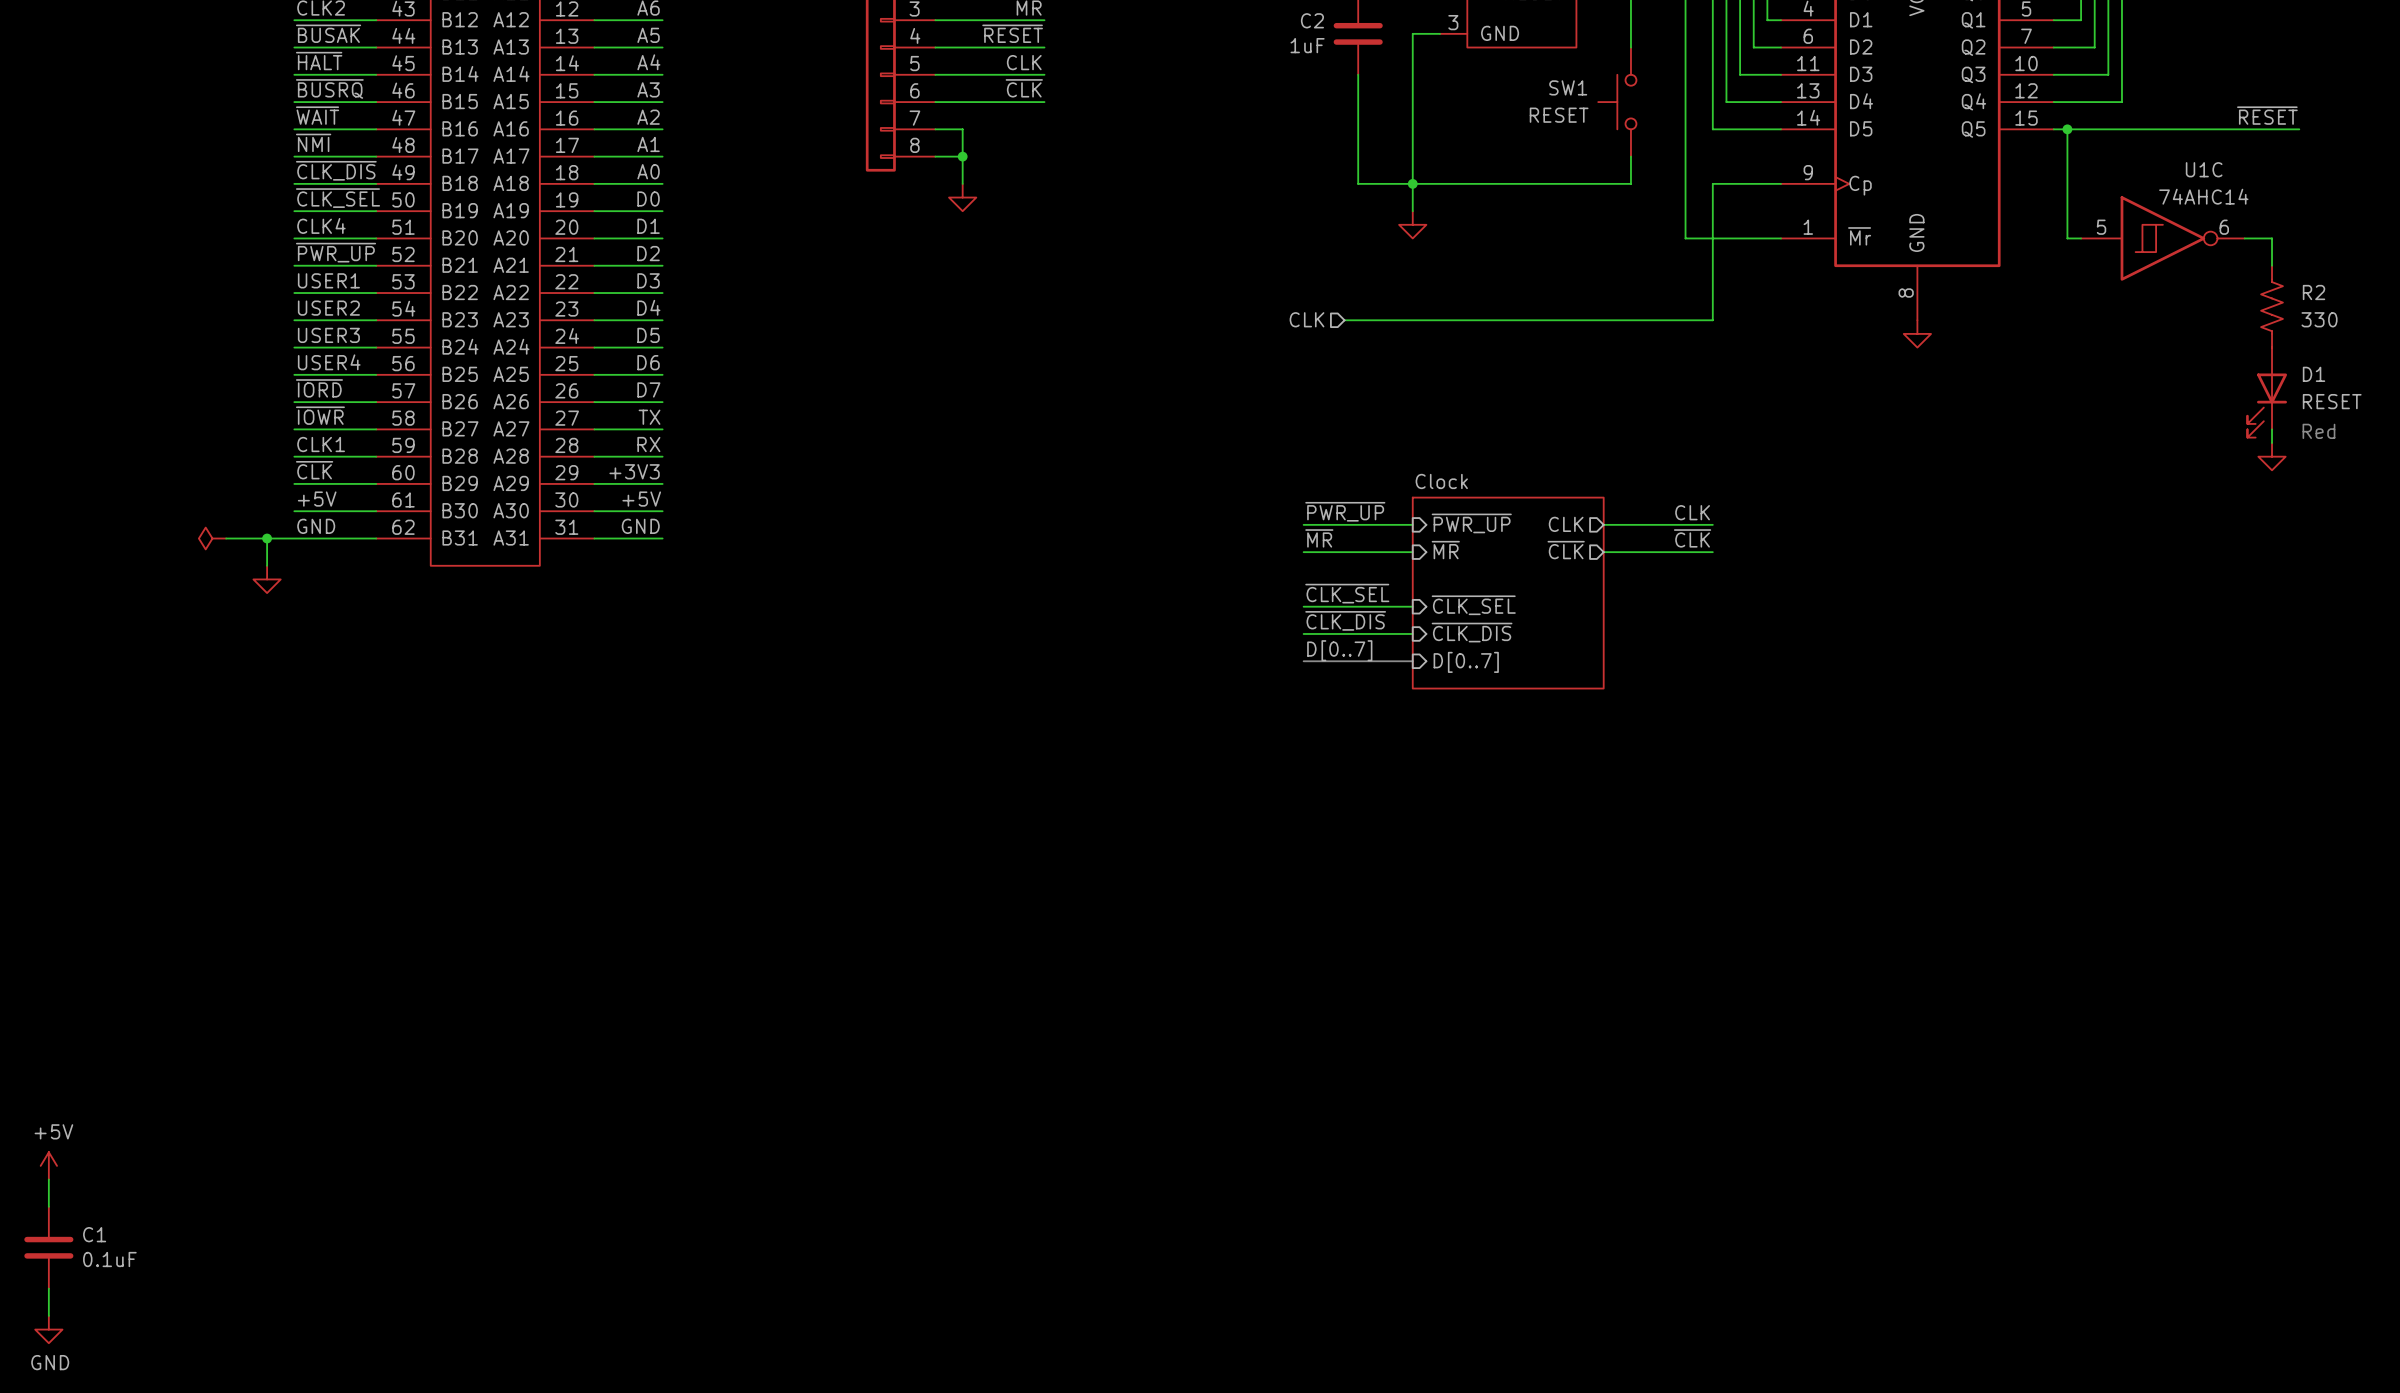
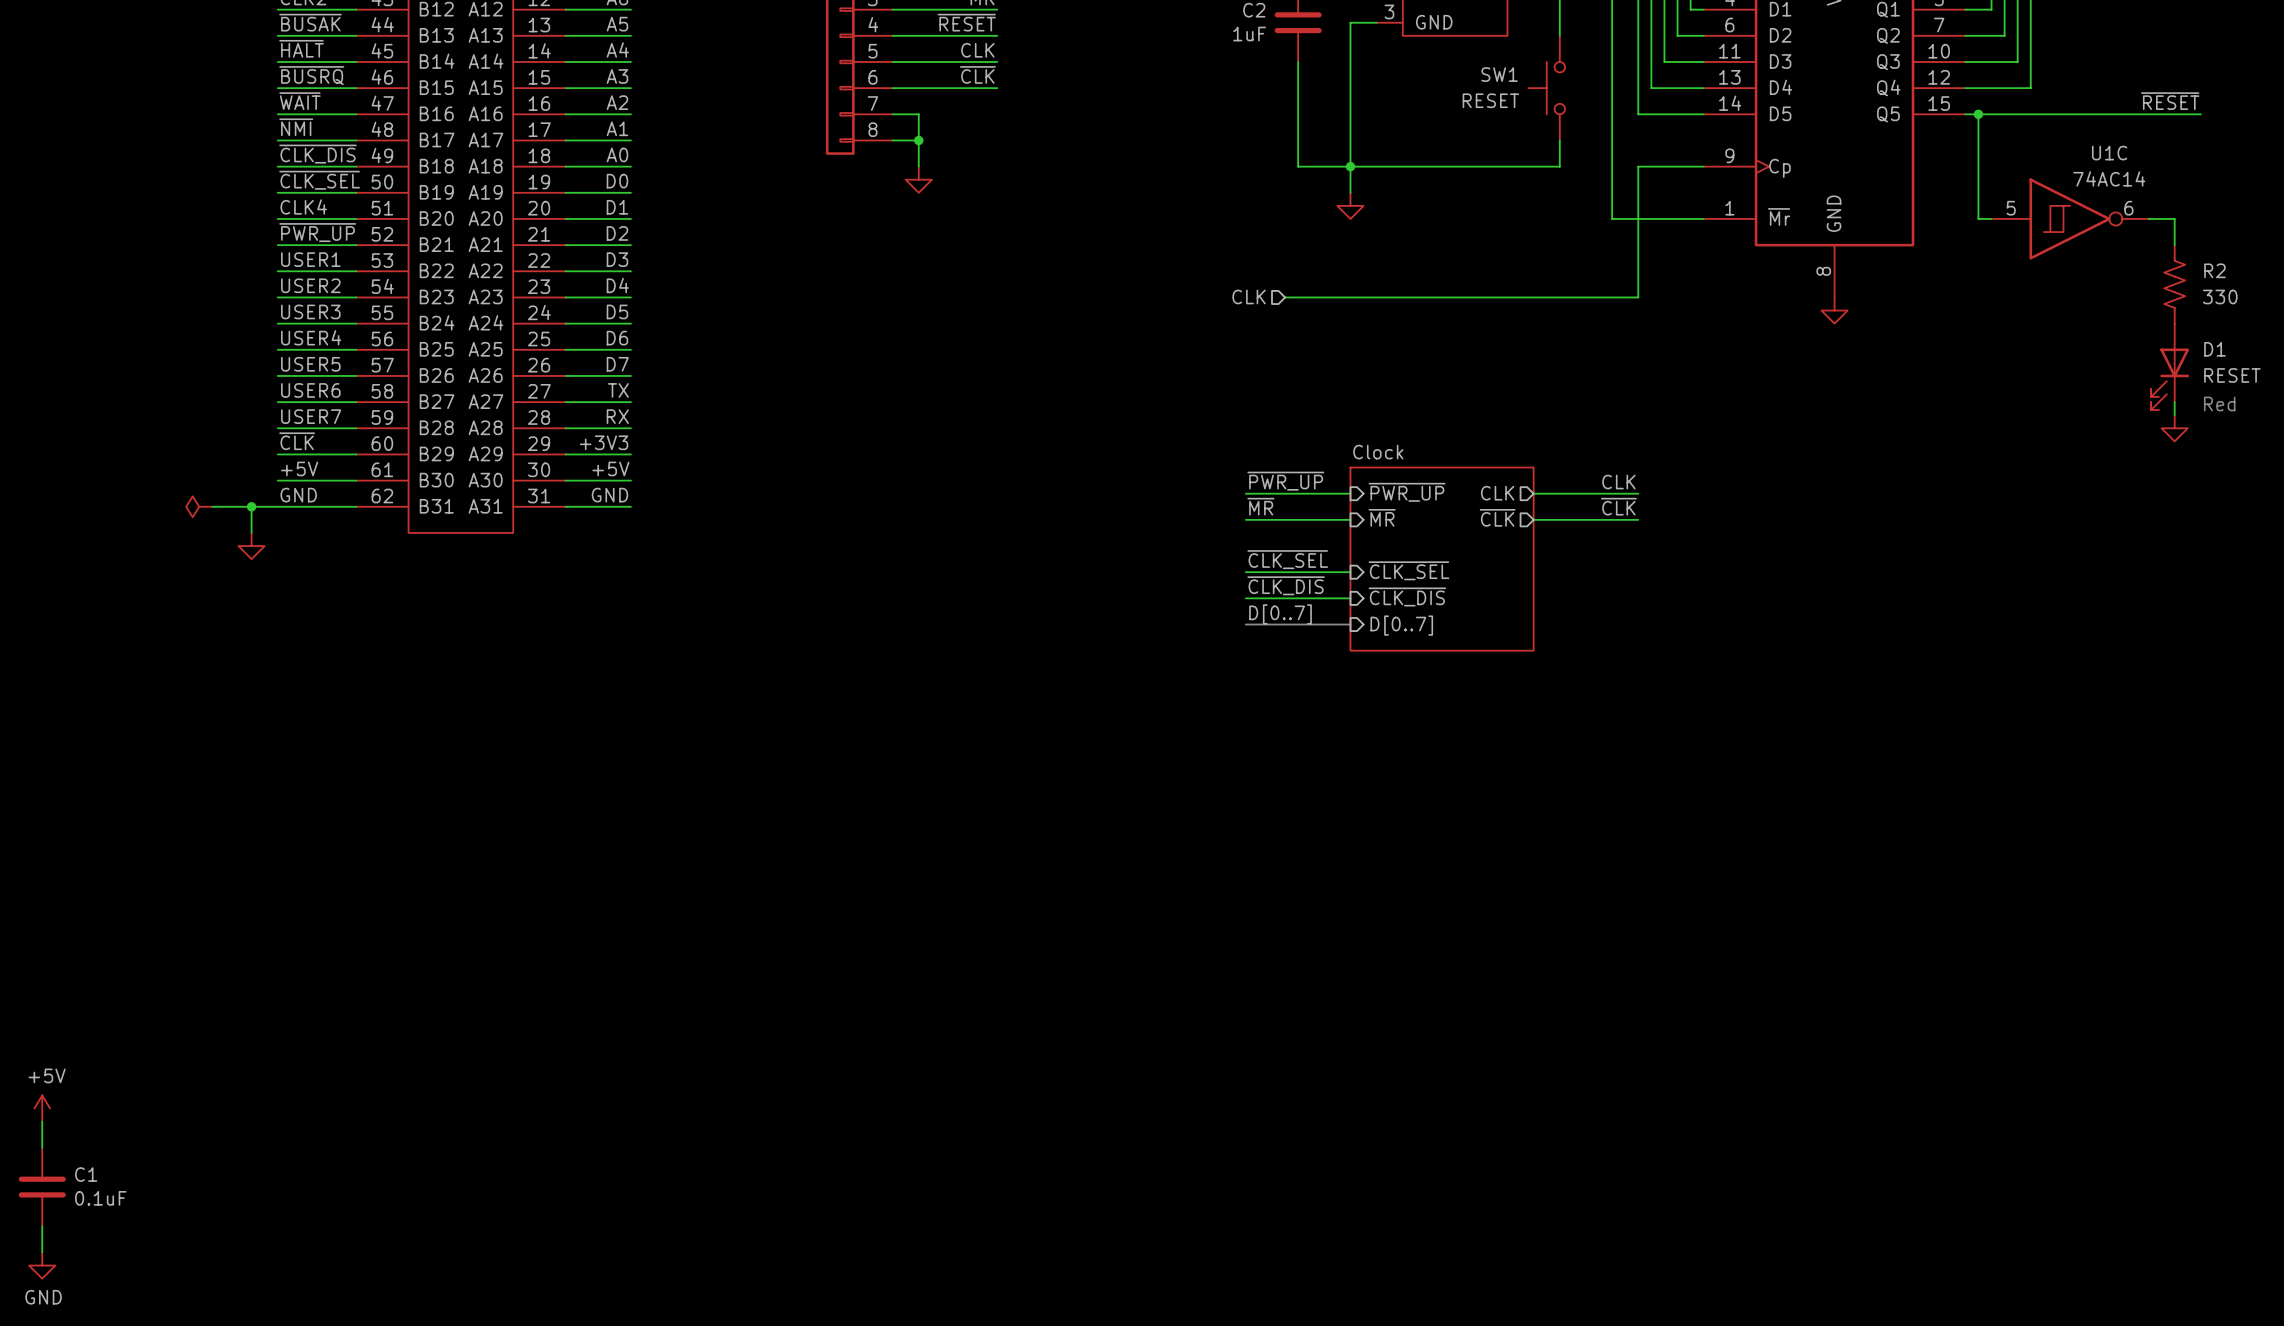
U1C value: 74AHC14 (2203, 196) -> 74AC14 (2109, 178)
label: ~{IORD} (319, 388) -> USER5 (310, 364)
label: ~{IOWR} (320, 415) -> USER6 (310, 390)
label: CLK1 (321, 444) -> USER7 (311, 416)

